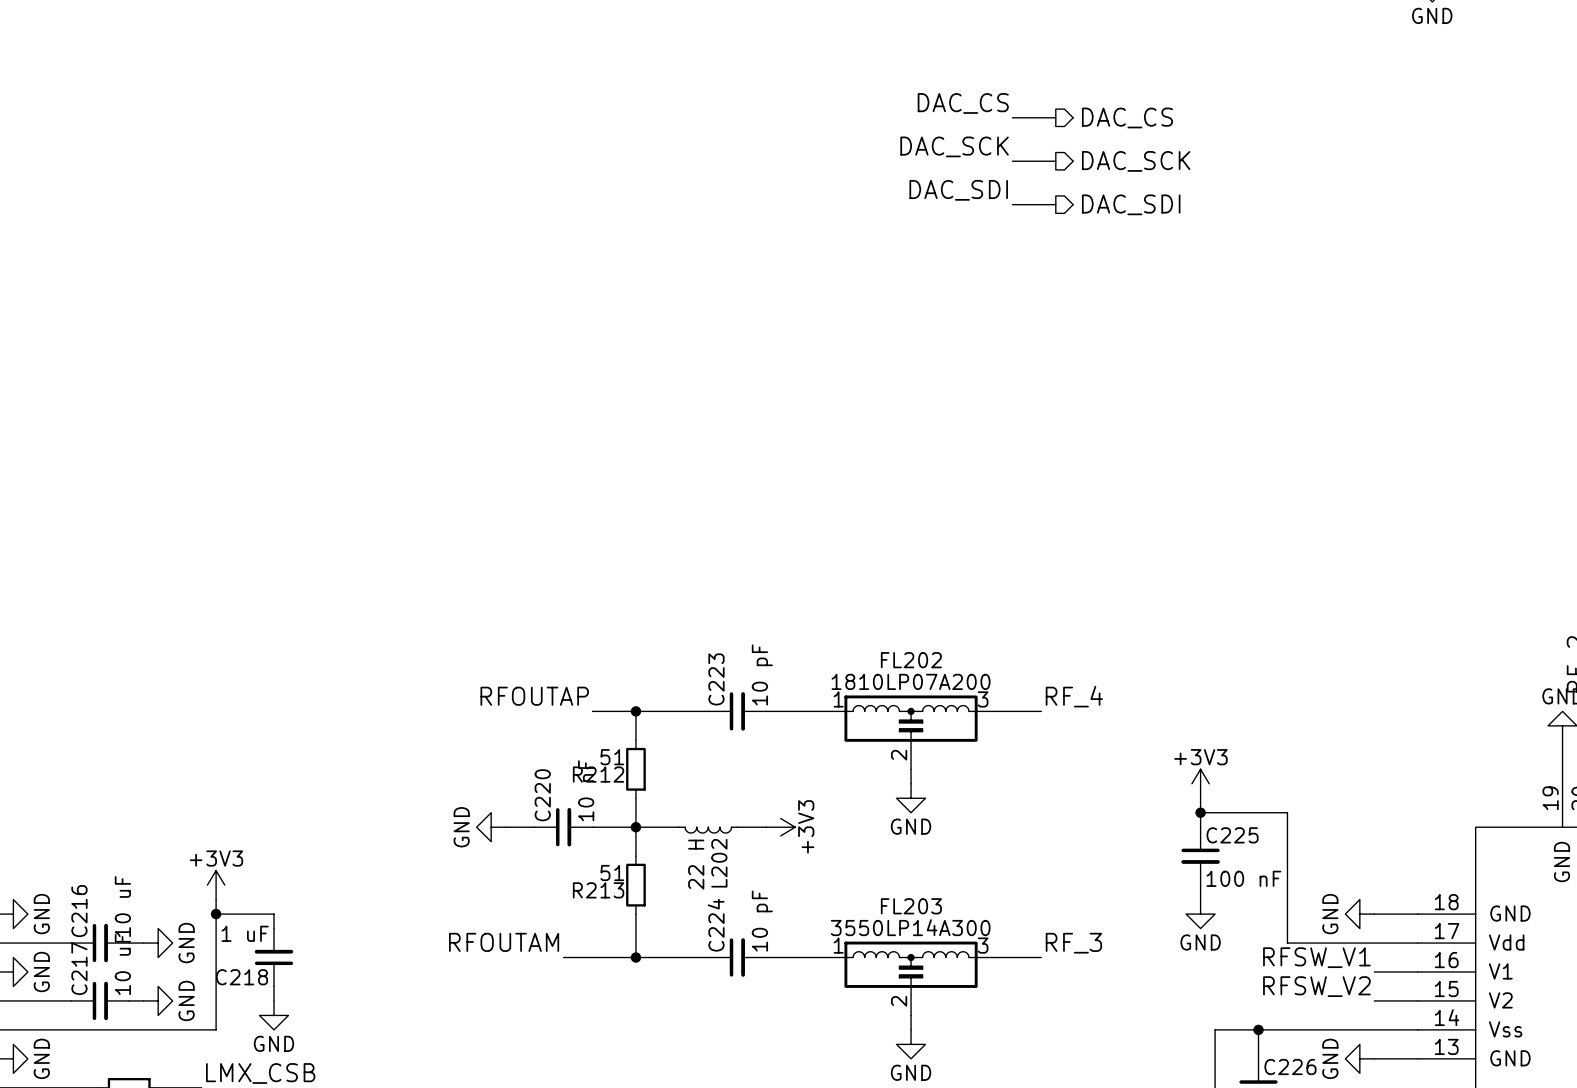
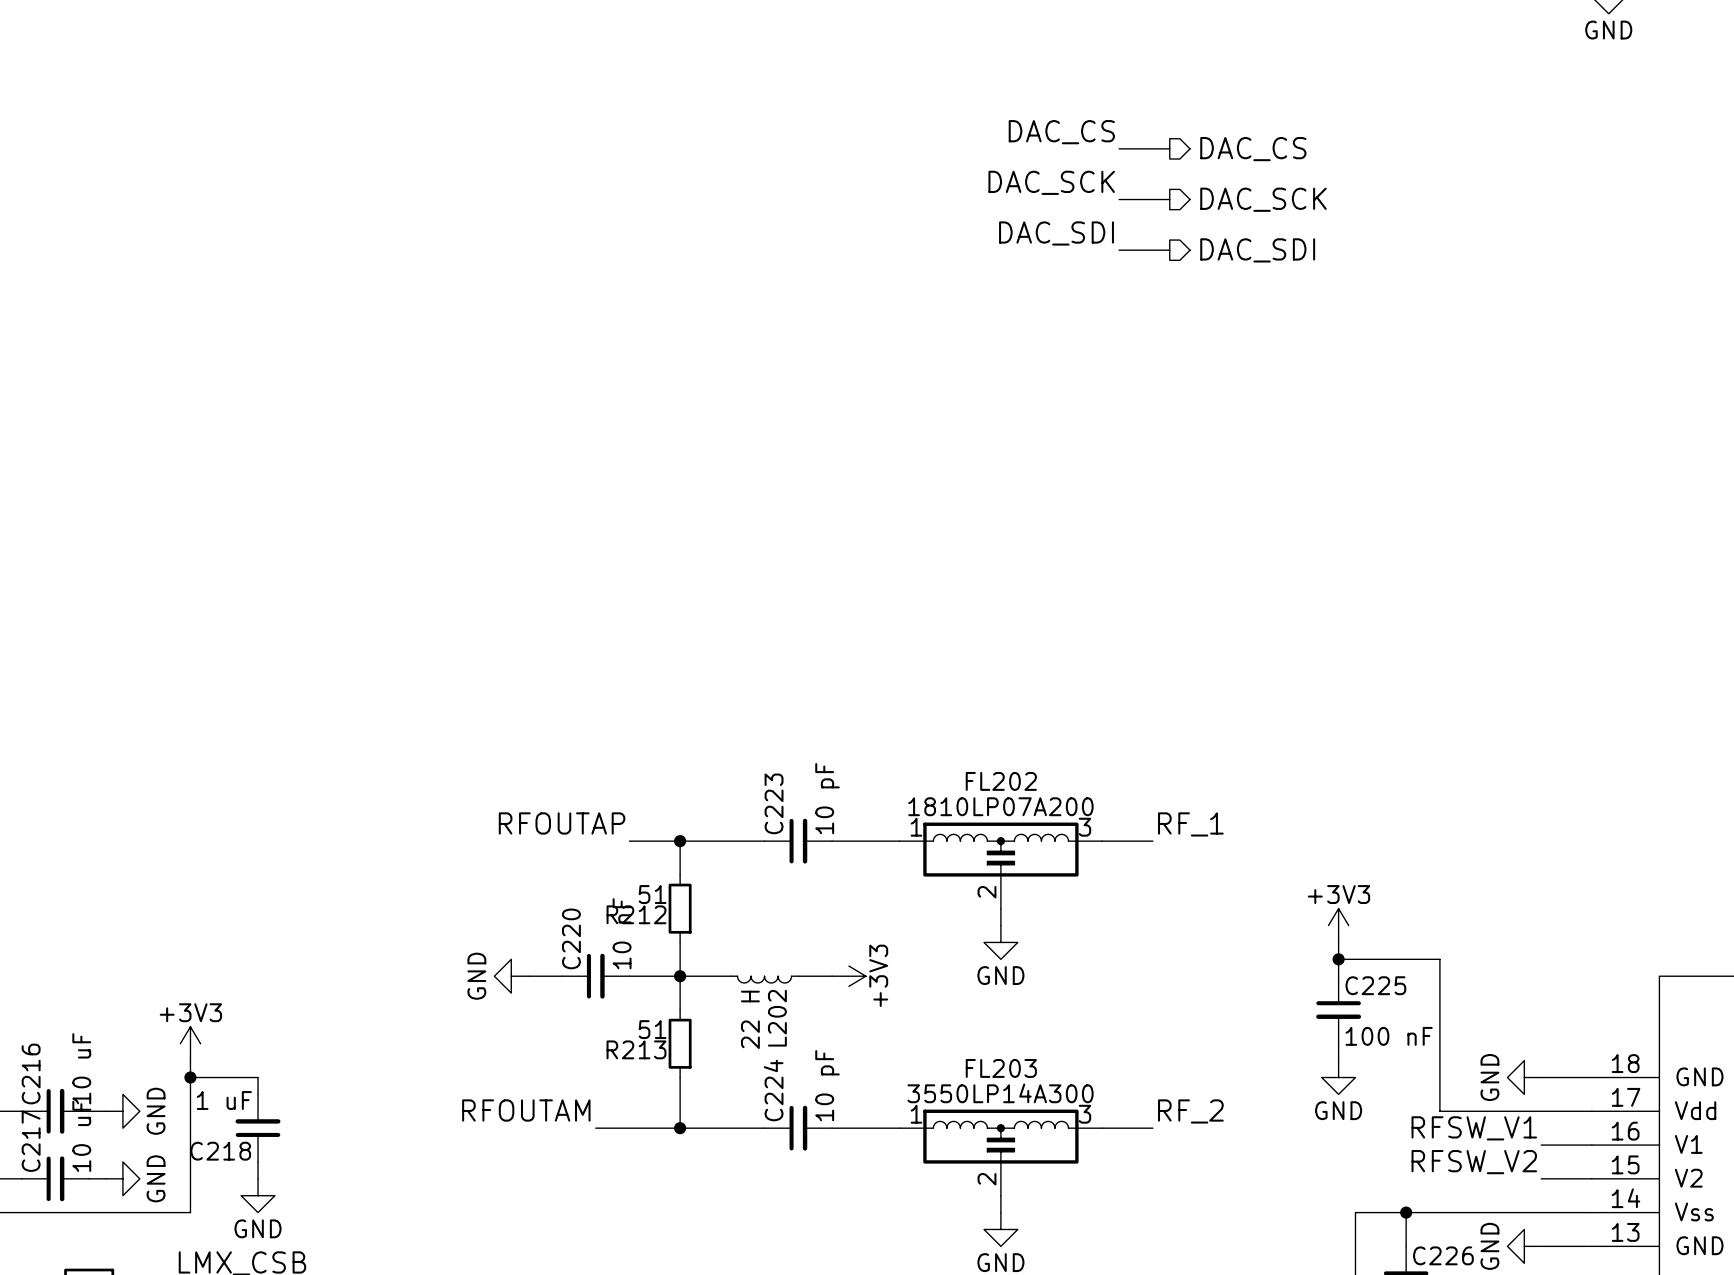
label: RF_4 (1074, 696) -> RF_1 (1190, 824)
label: RF_3 (1073, 943) -> RF_2 (1190, 1111)

